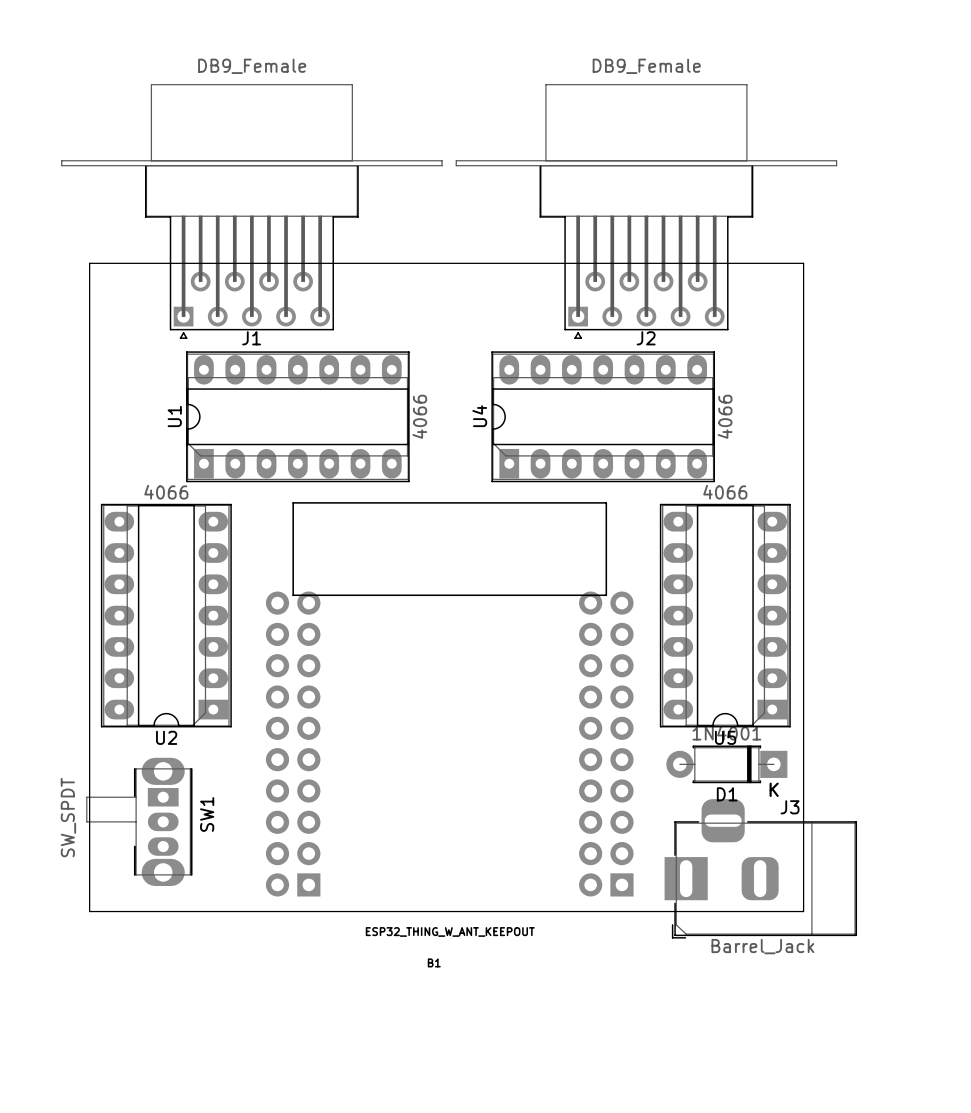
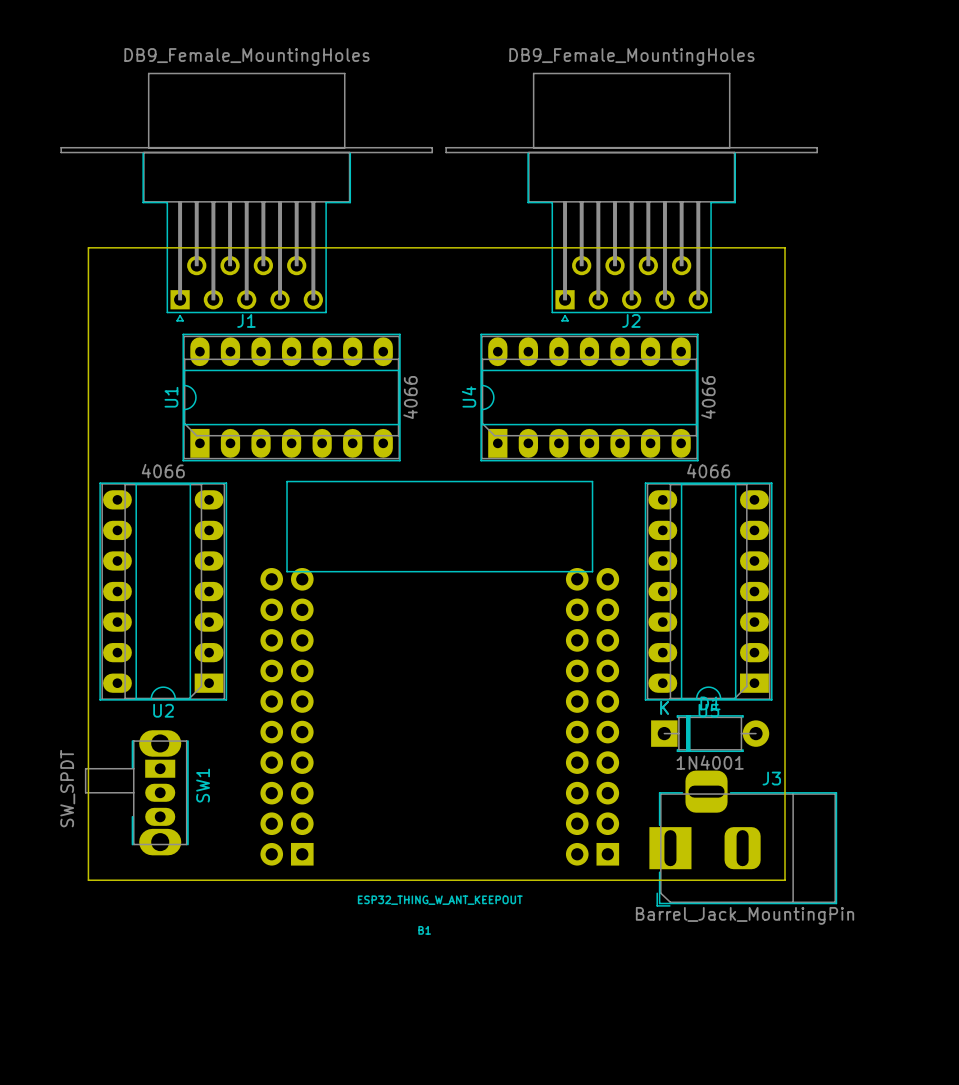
J1 value: DB9_Female (252, 66) -> DB9_Female_MountingHoles (247, 57)
J2 value: DB9_Female (646, 66) -> DB9_Female_MountingHoles (631, 57)
D1 rotation: 0° (726, 764) -> 180° (710, 733)
J3 value: Barrel_Jack (762, 946) -> Barrel_Jack_MountingPin (745, 915)

